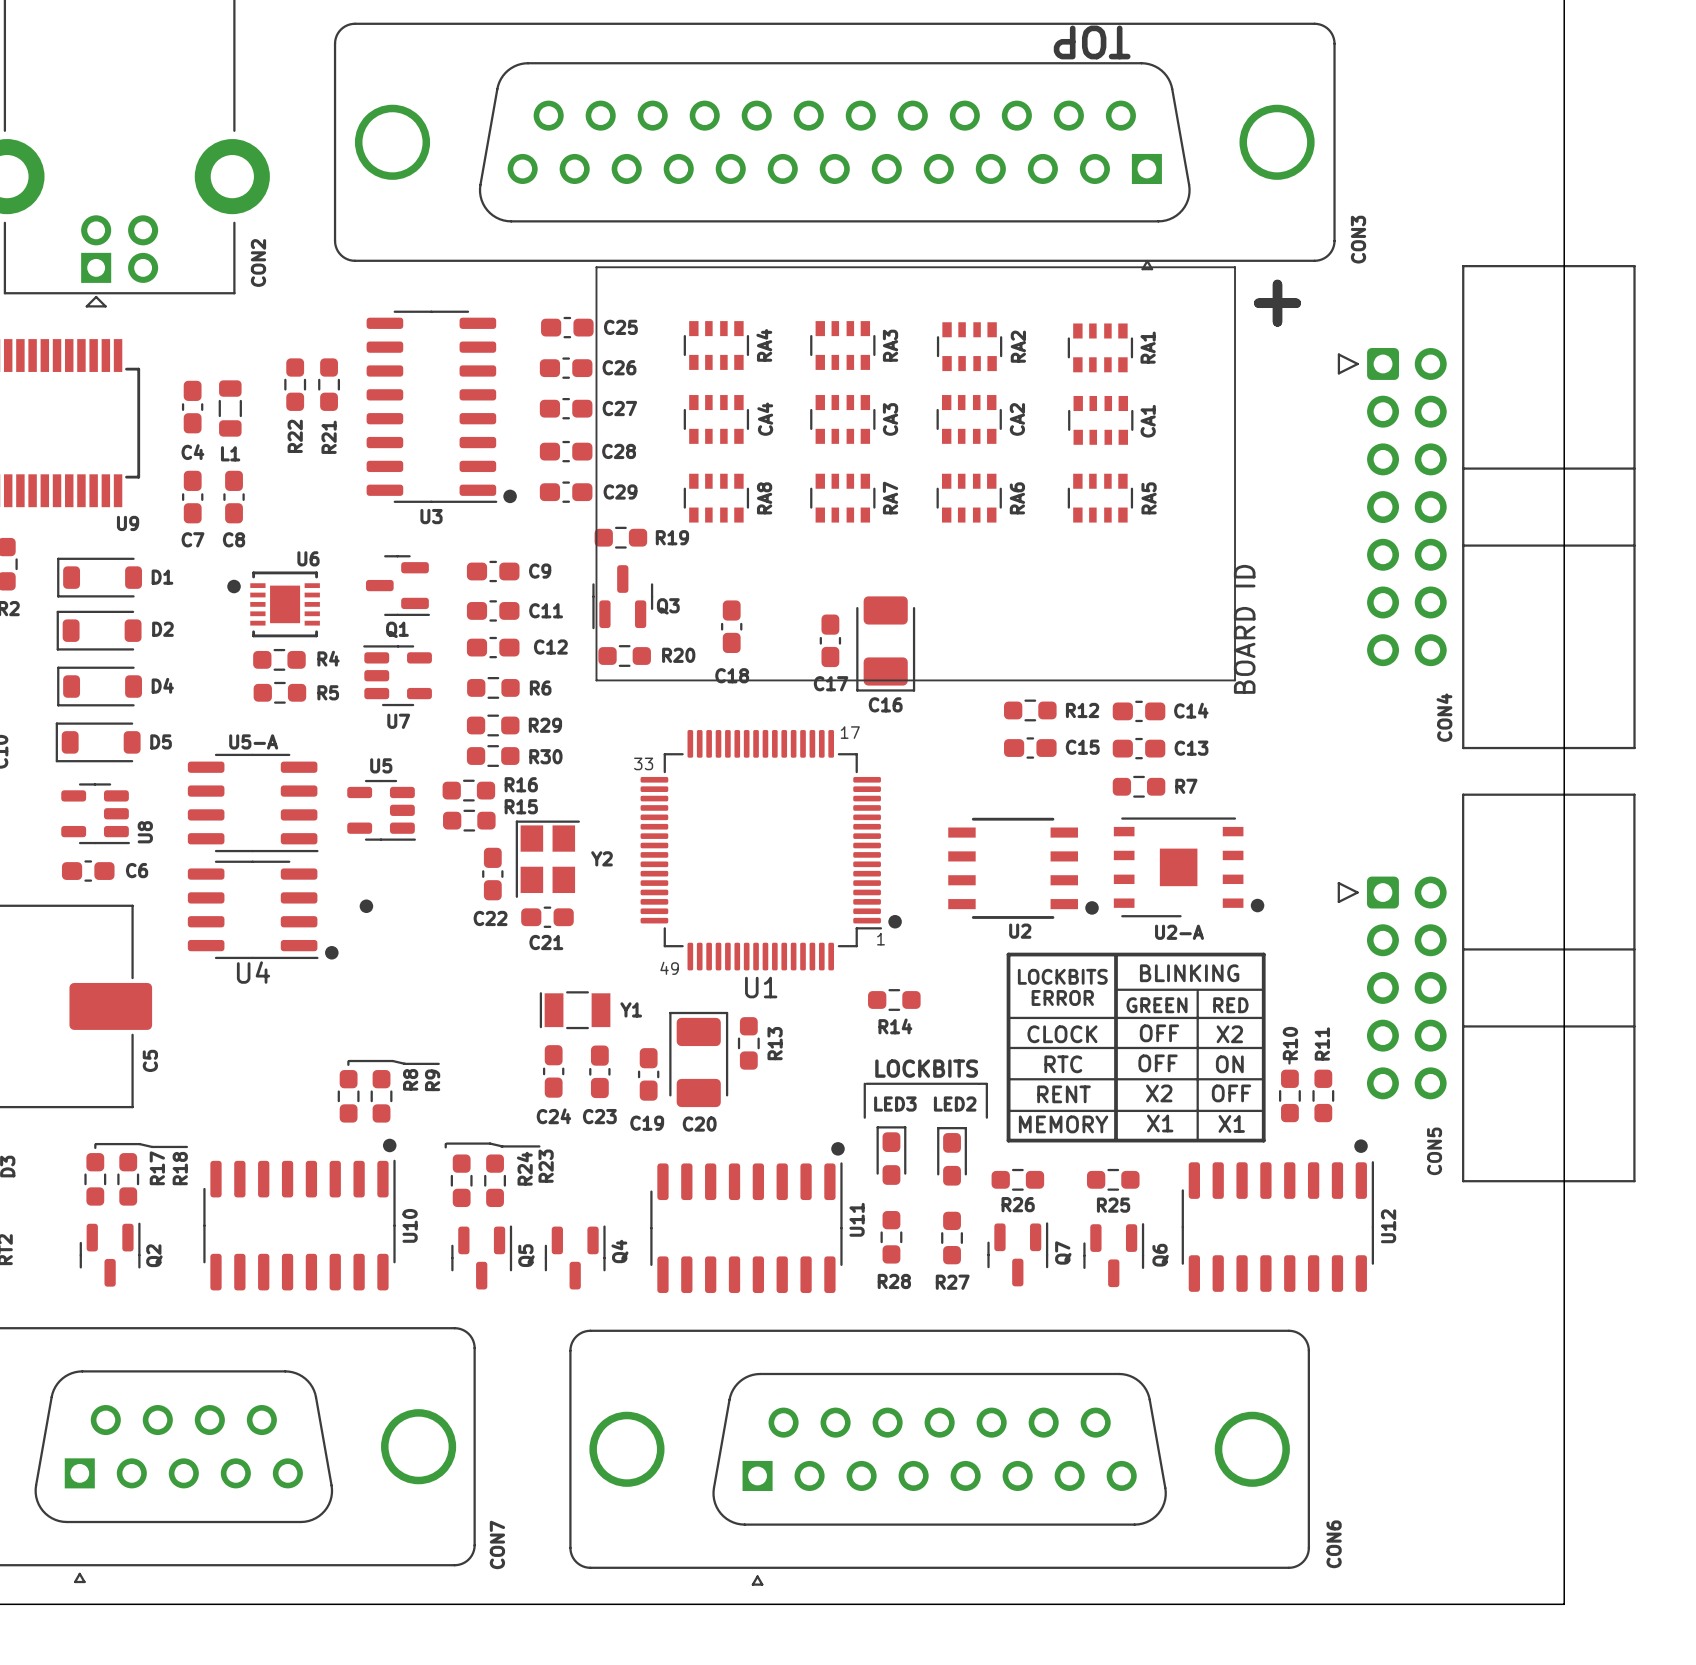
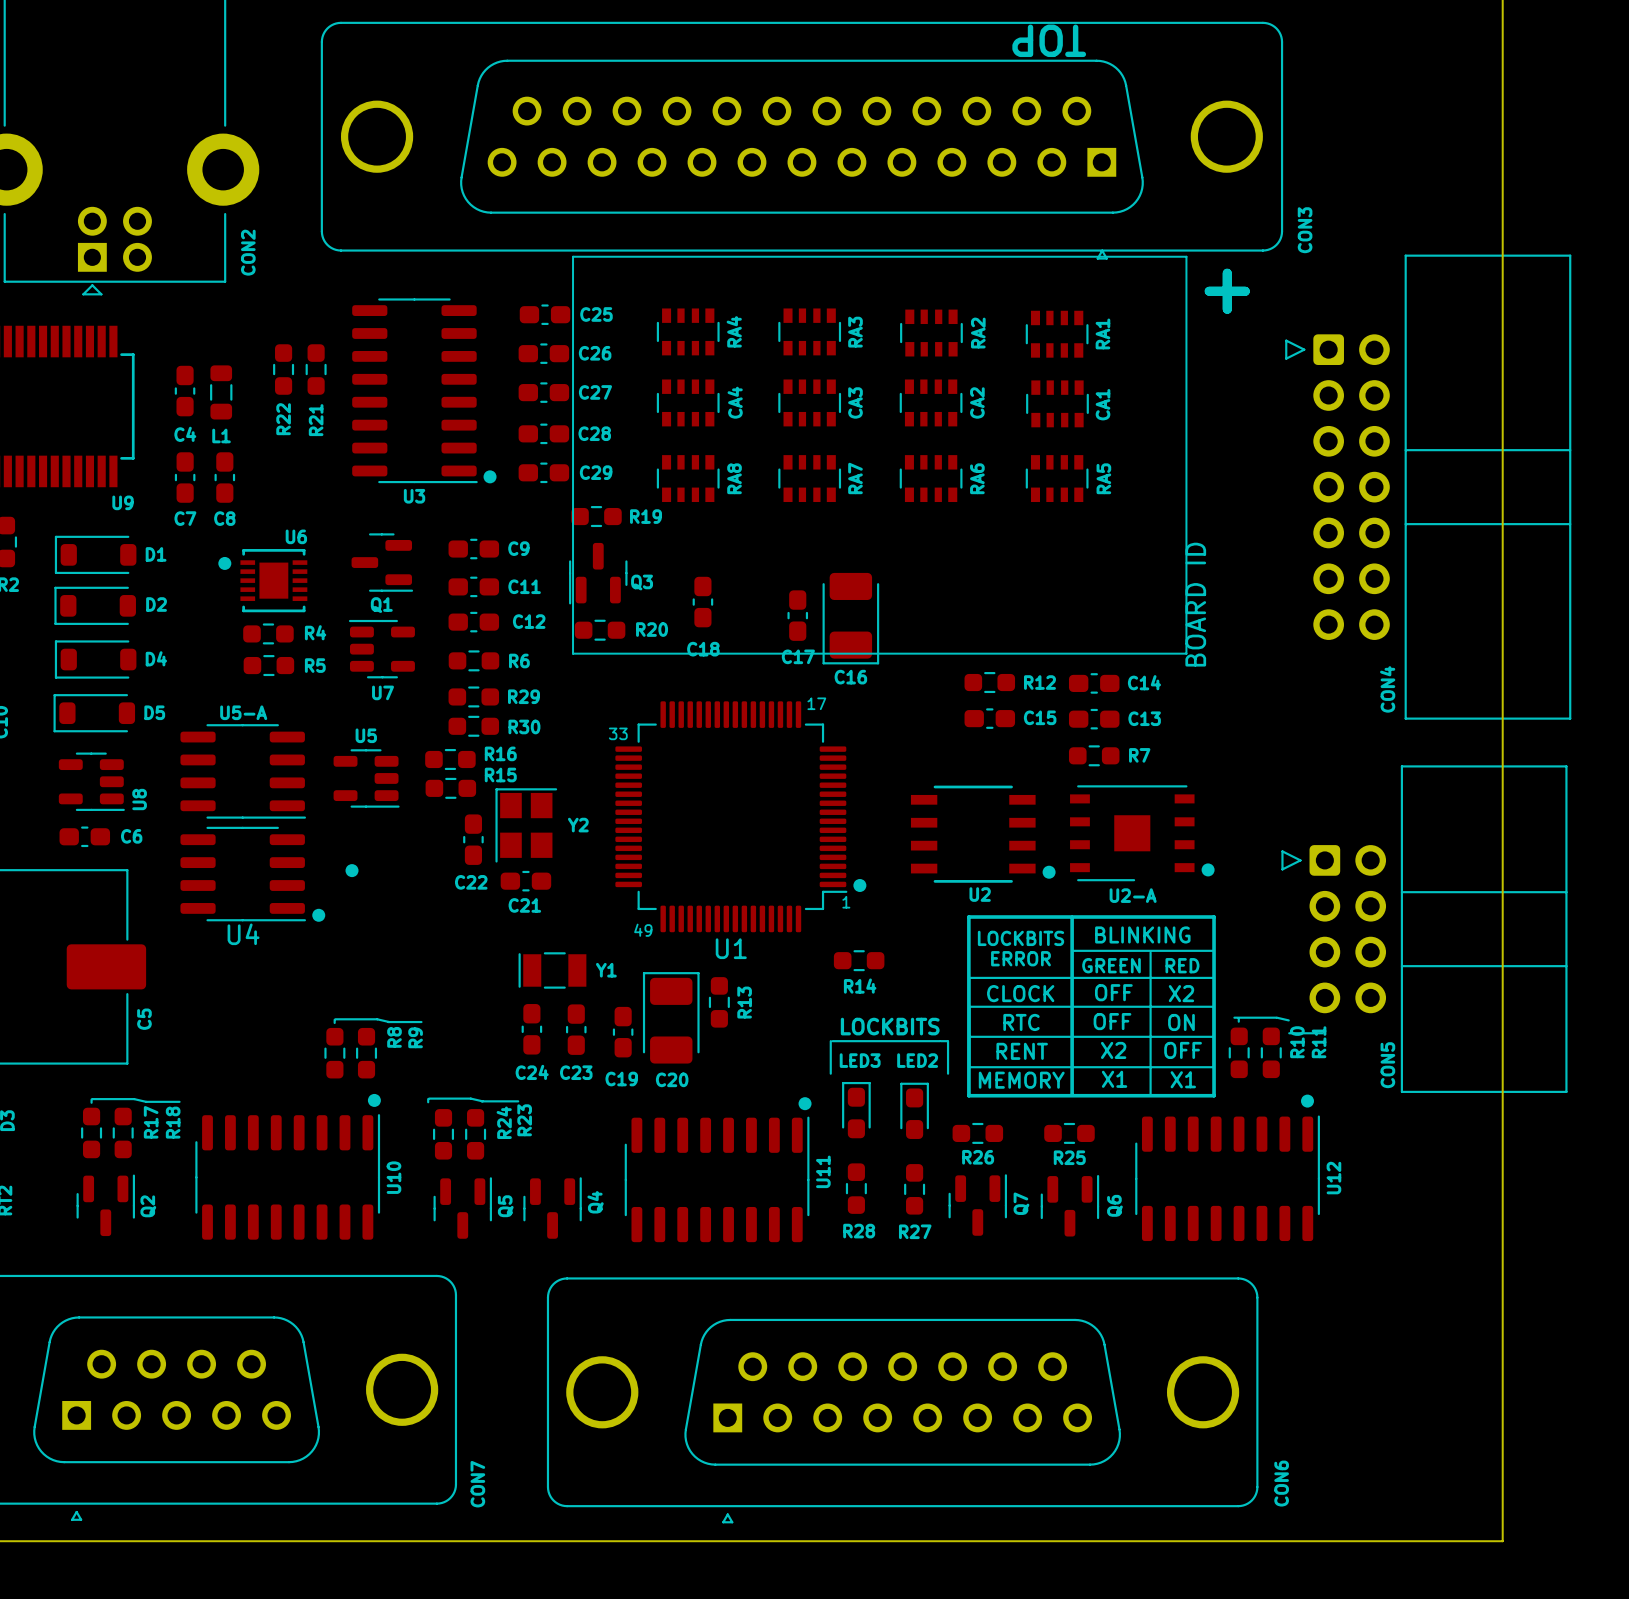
CON5 footprint: [1337, 793, 1636, 1183] -> [1281, 765, 1568, 1093]
R10 name position: R10 (1290, 1043) -> R10 (1297, 1042)
R11 name position: R11 (1322, 1043) -> R11 (1319, 1042)
line: none -> (1234, 1017) (1276, 1017)
line: none -> (1276, 1017) (1288, 1020)
line: none -> (1289, 1033) (1322, 1033)

